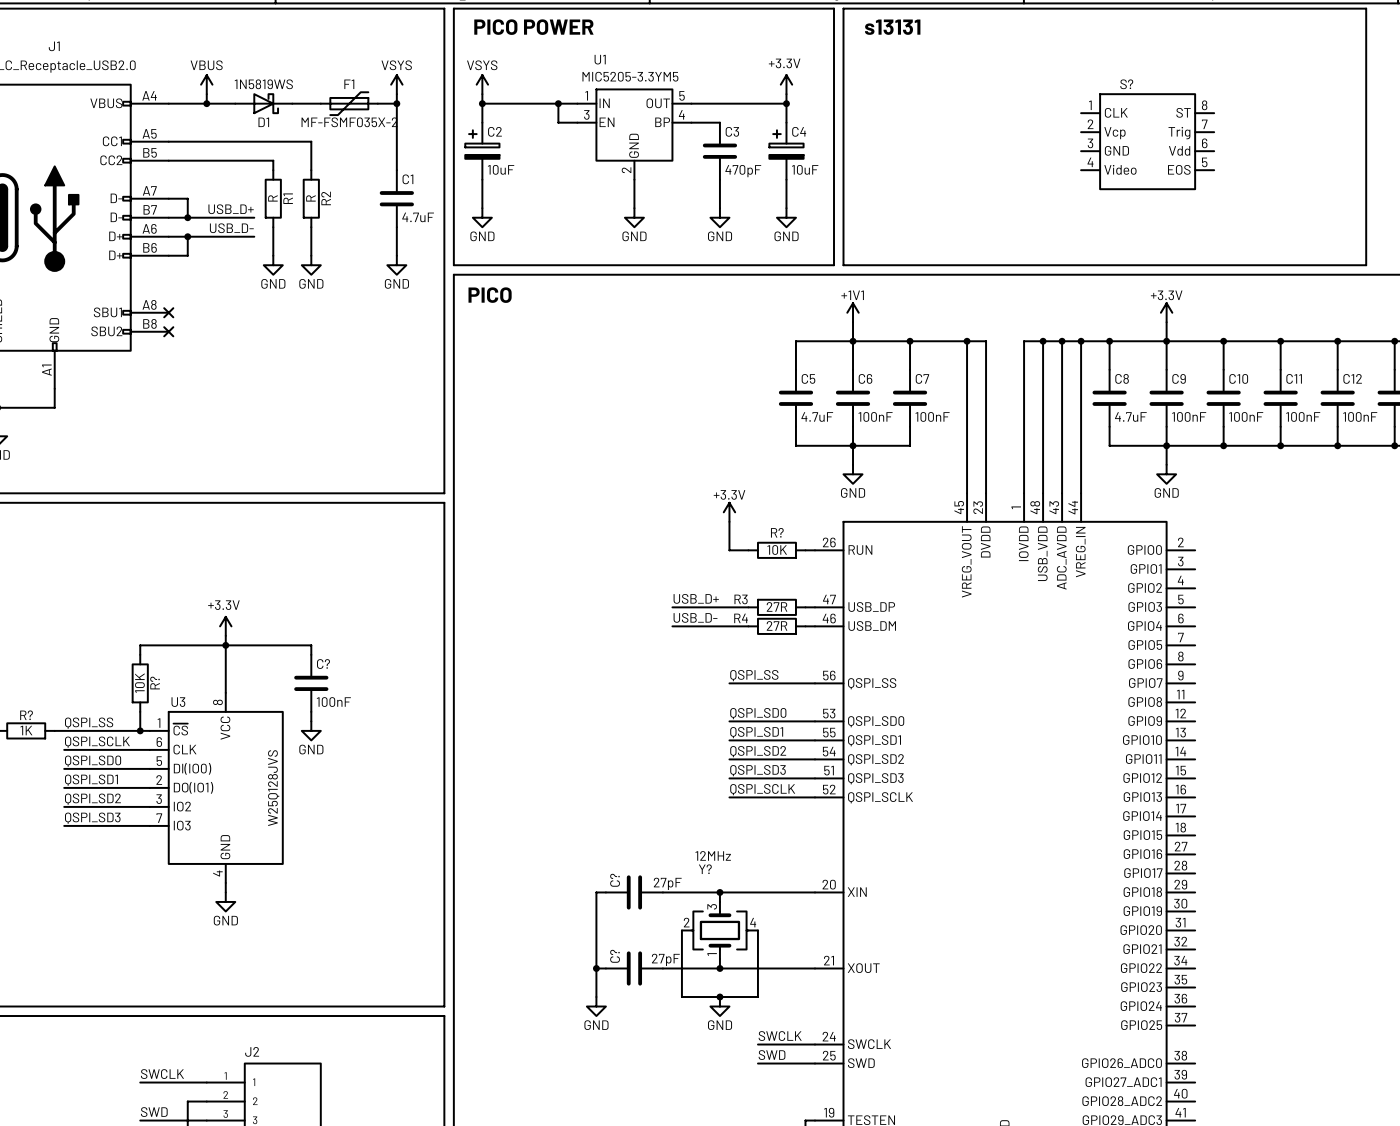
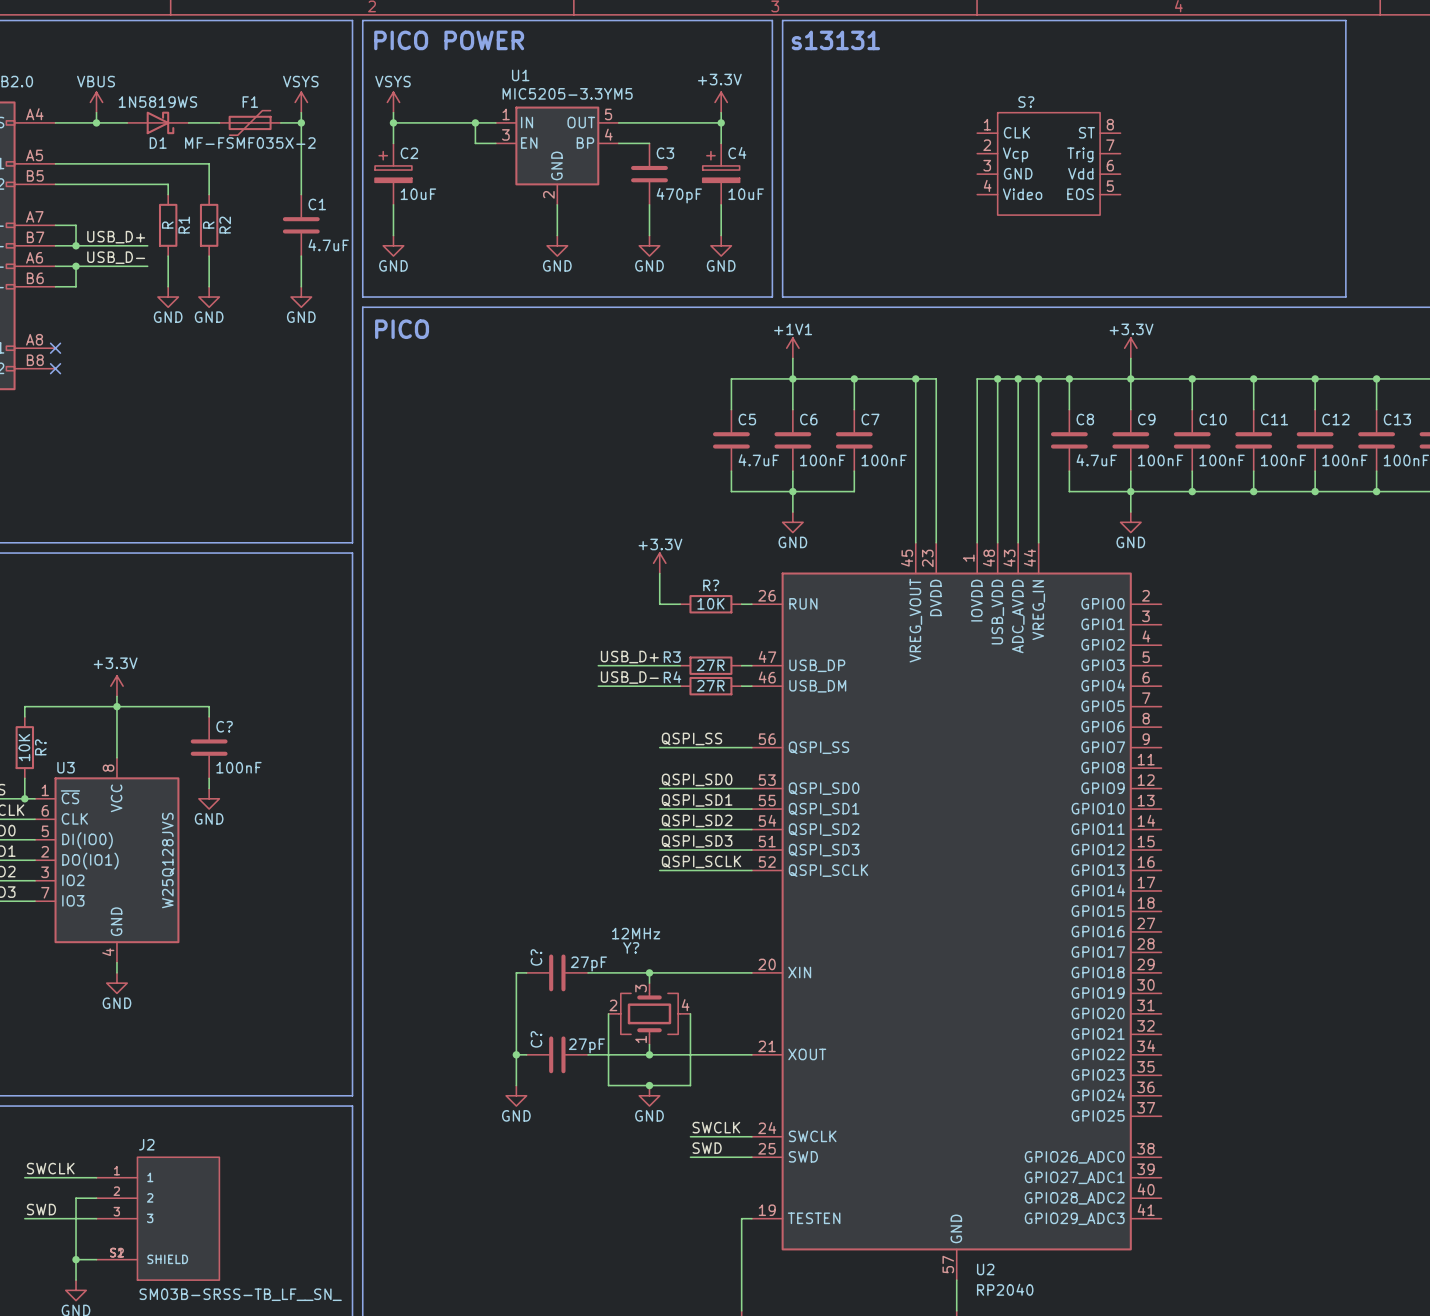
S? position: (1147, 141) -> (1048, 163)

